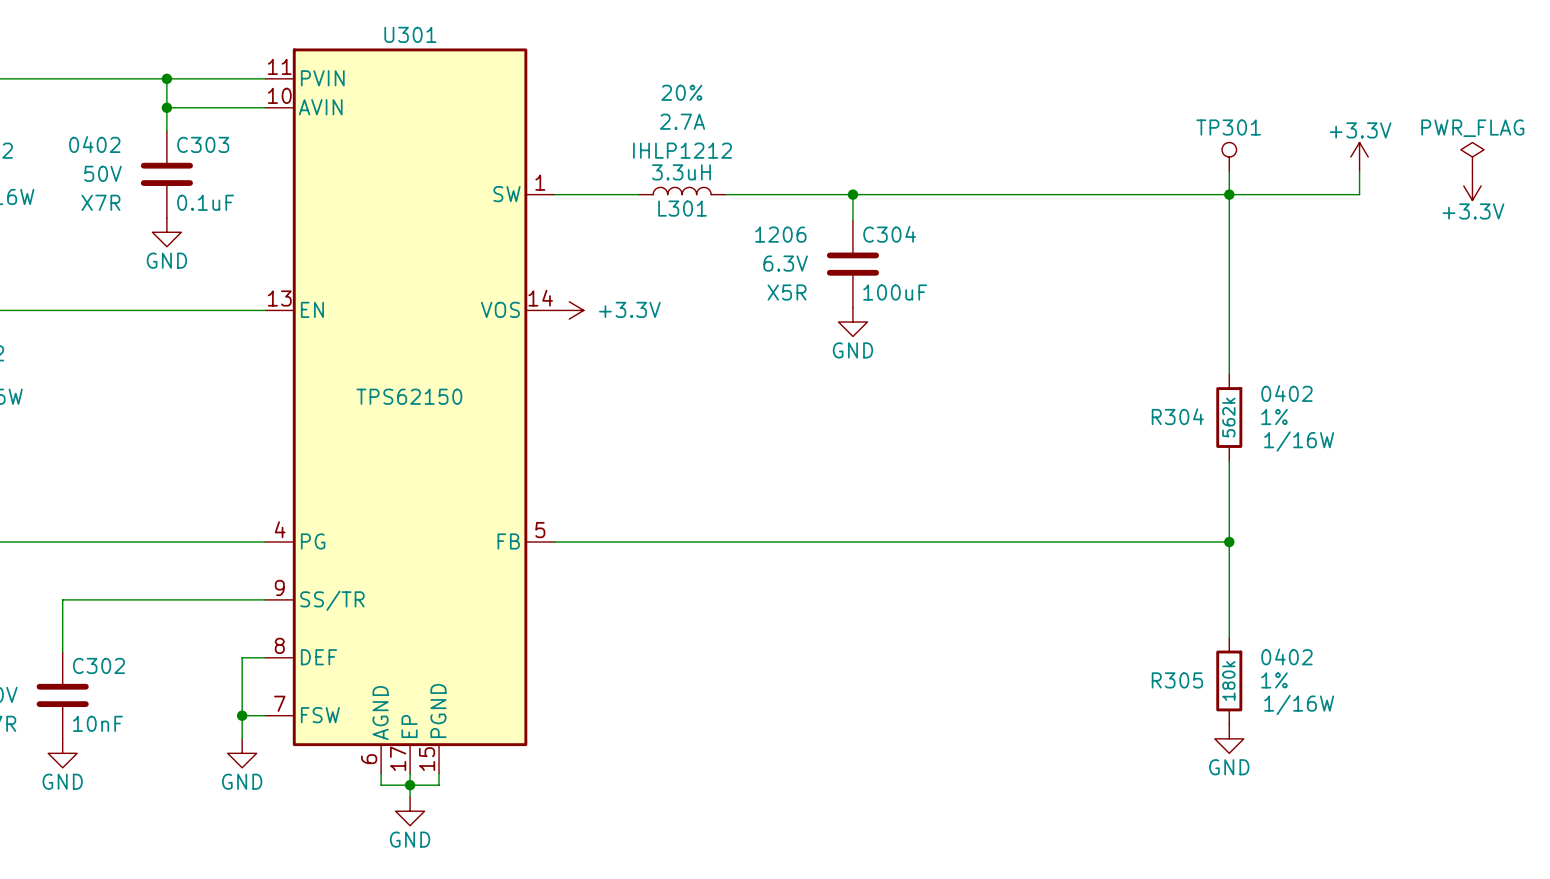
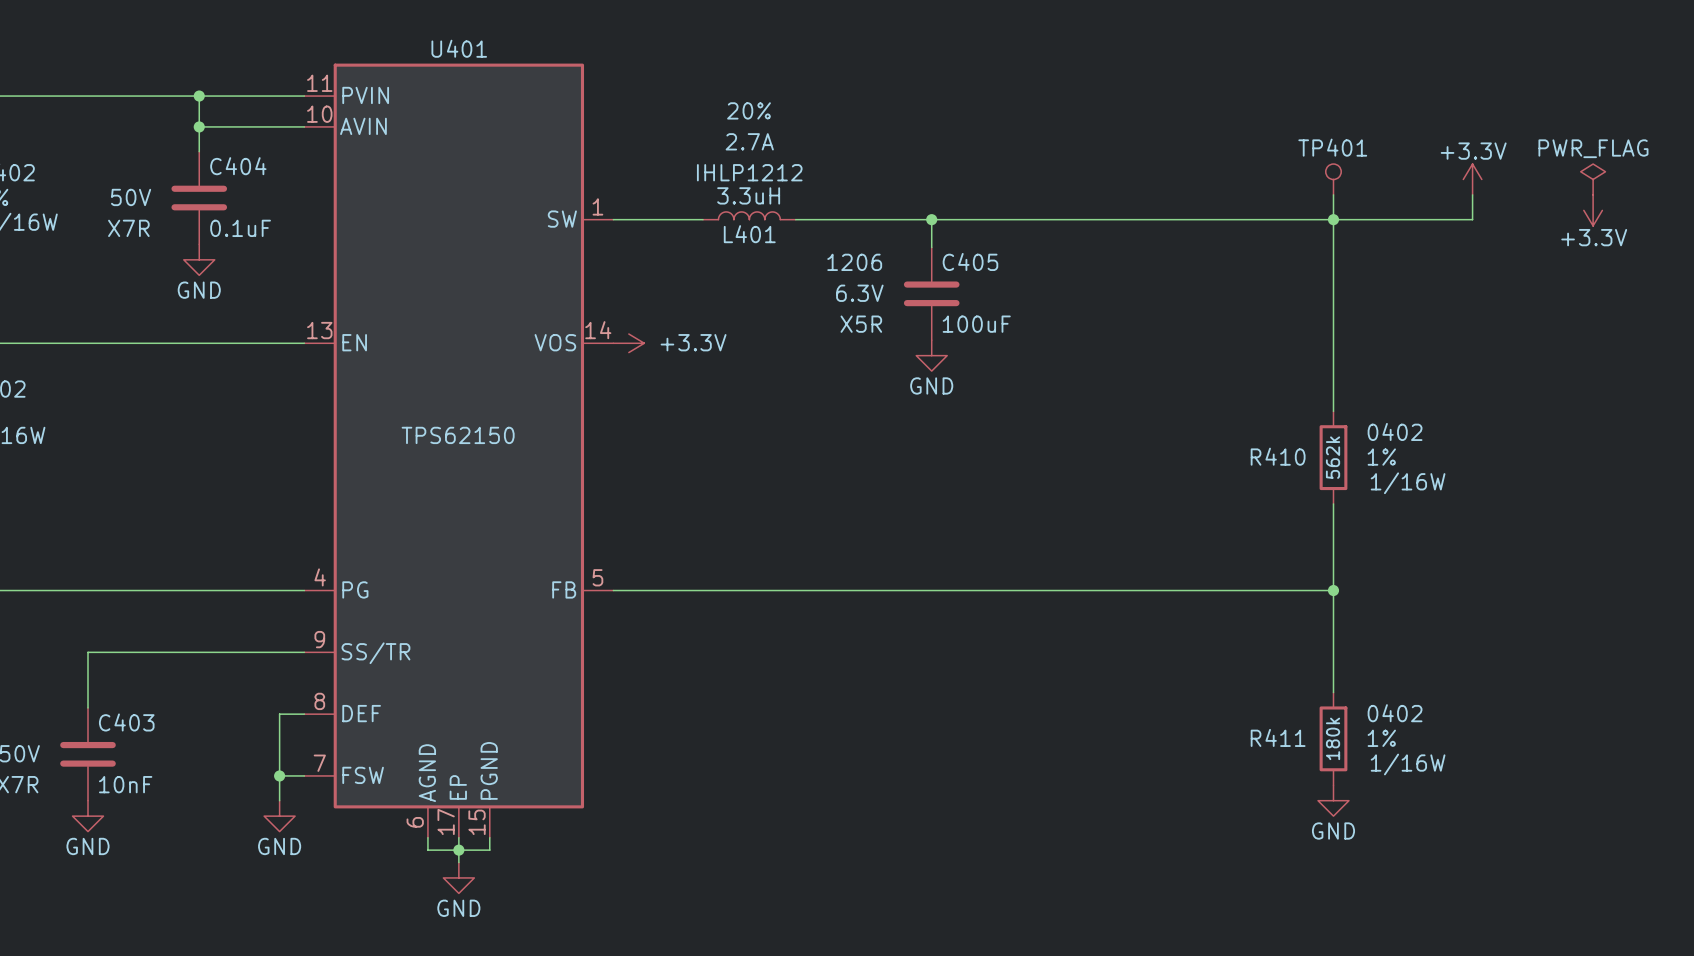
U301 name: U301 (410, 34) -> U401 (459, 48)
TP301 name: TP301 (1228, 127) -> TP401 (1332, 147)
C303 text: 0402 (94, 144) -> none
C303 name: C303 (203, 144) -> C404 (238, 166)
L301 name: L301 (682, 208) -> L401 (749, 234)
C304 name: C304 (889, 234) -> C405 (970, 261)
R304 name: R304 (1177, 416) -> R410 (1278, 456)
C302 name: C302 (98, 665) -> C403 (126, 722)
R305 name: R305 (1177, 680) -> R411 (1278, 737)

